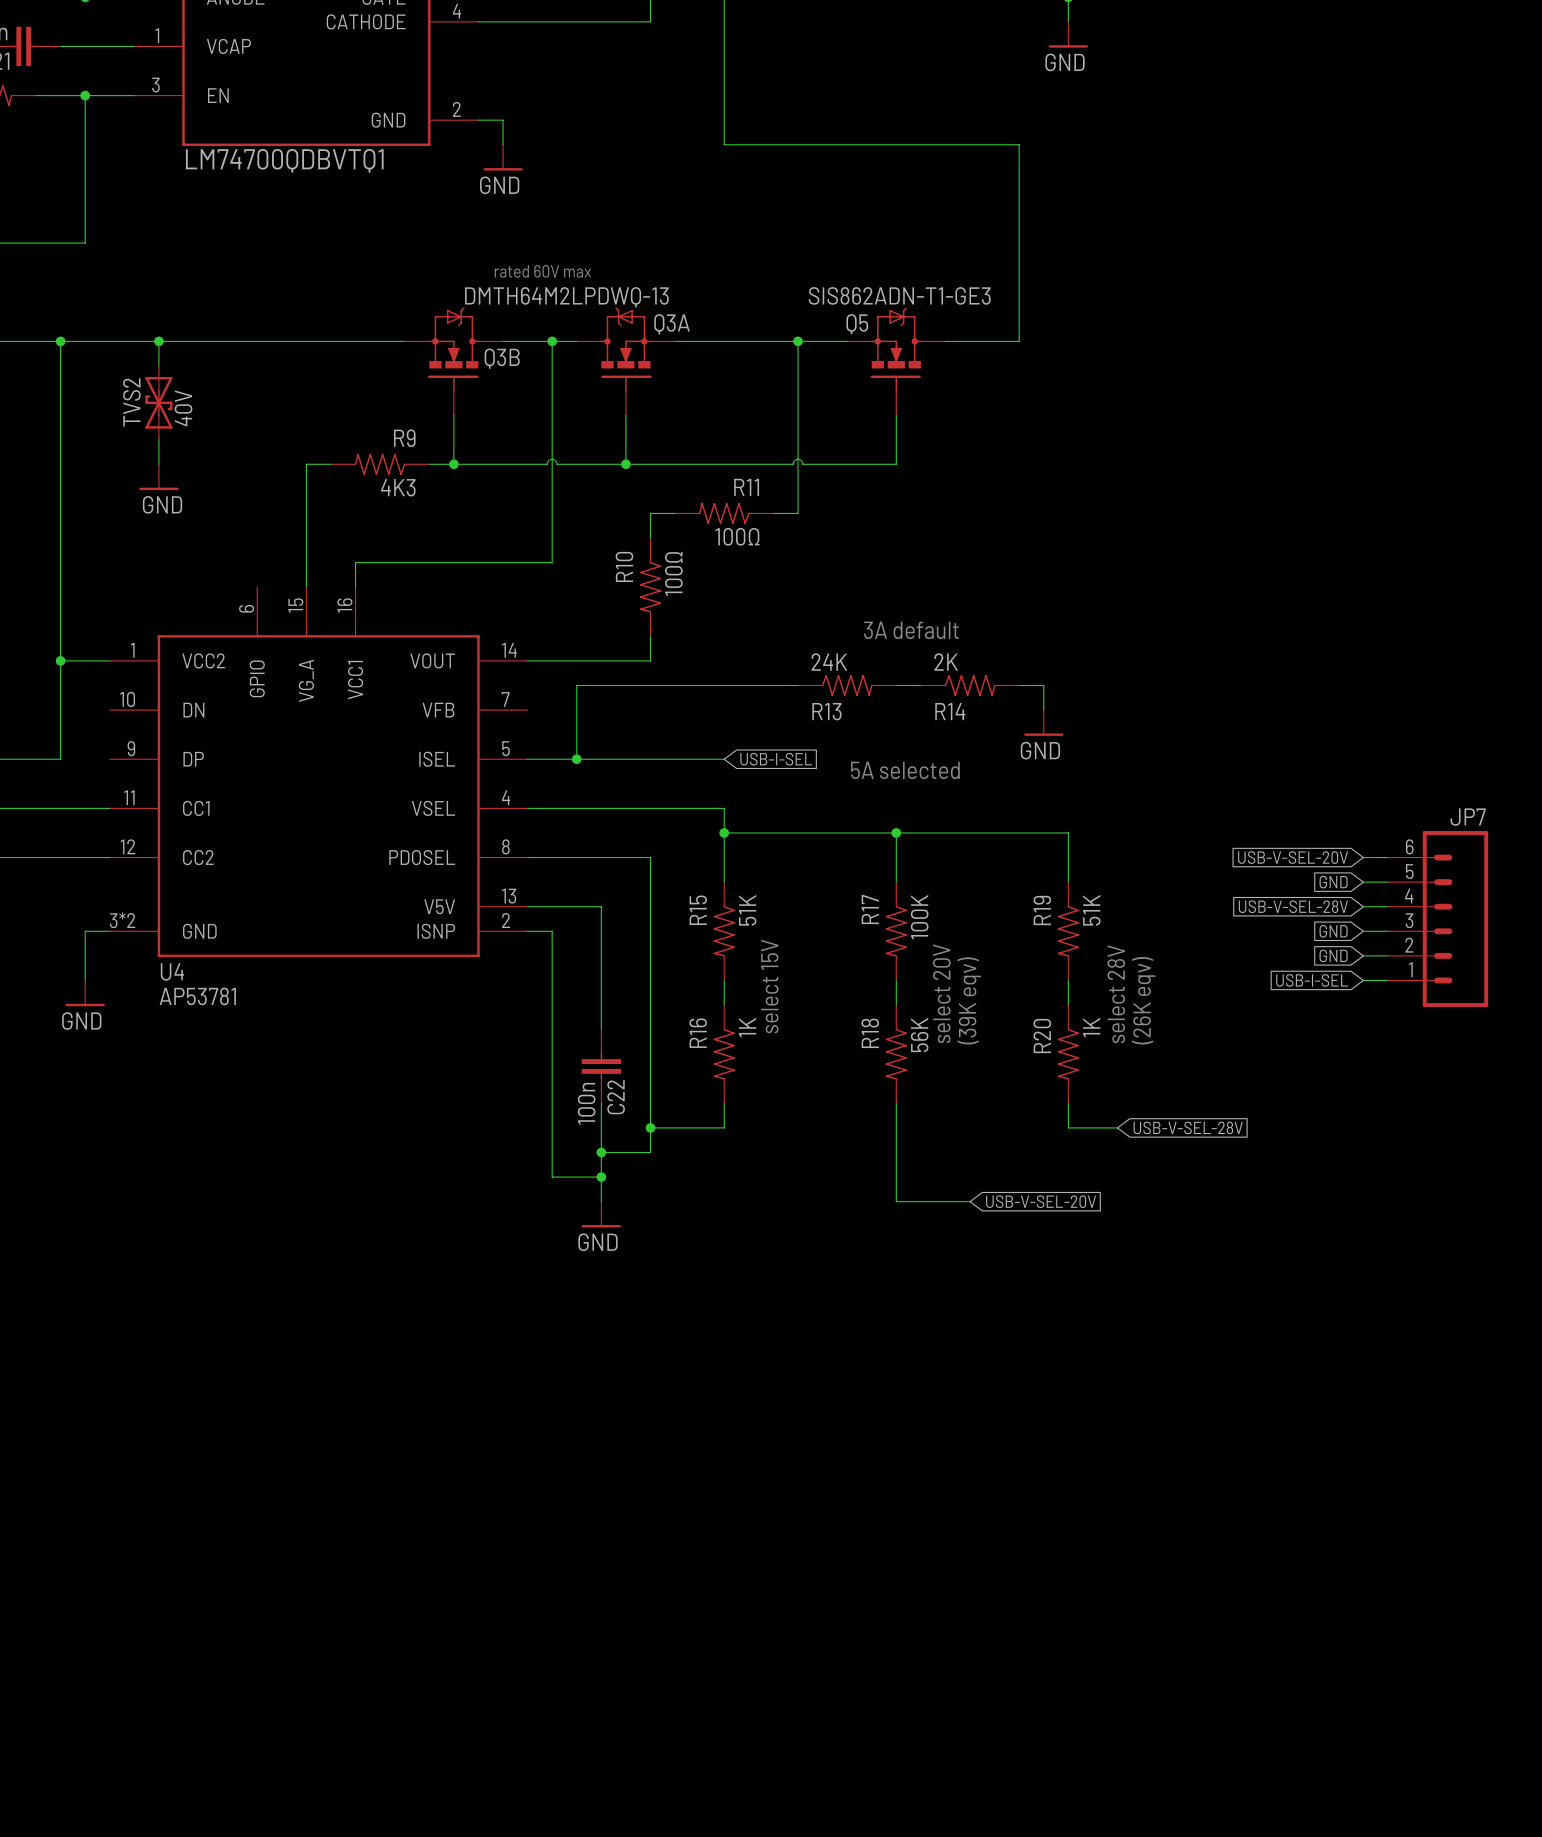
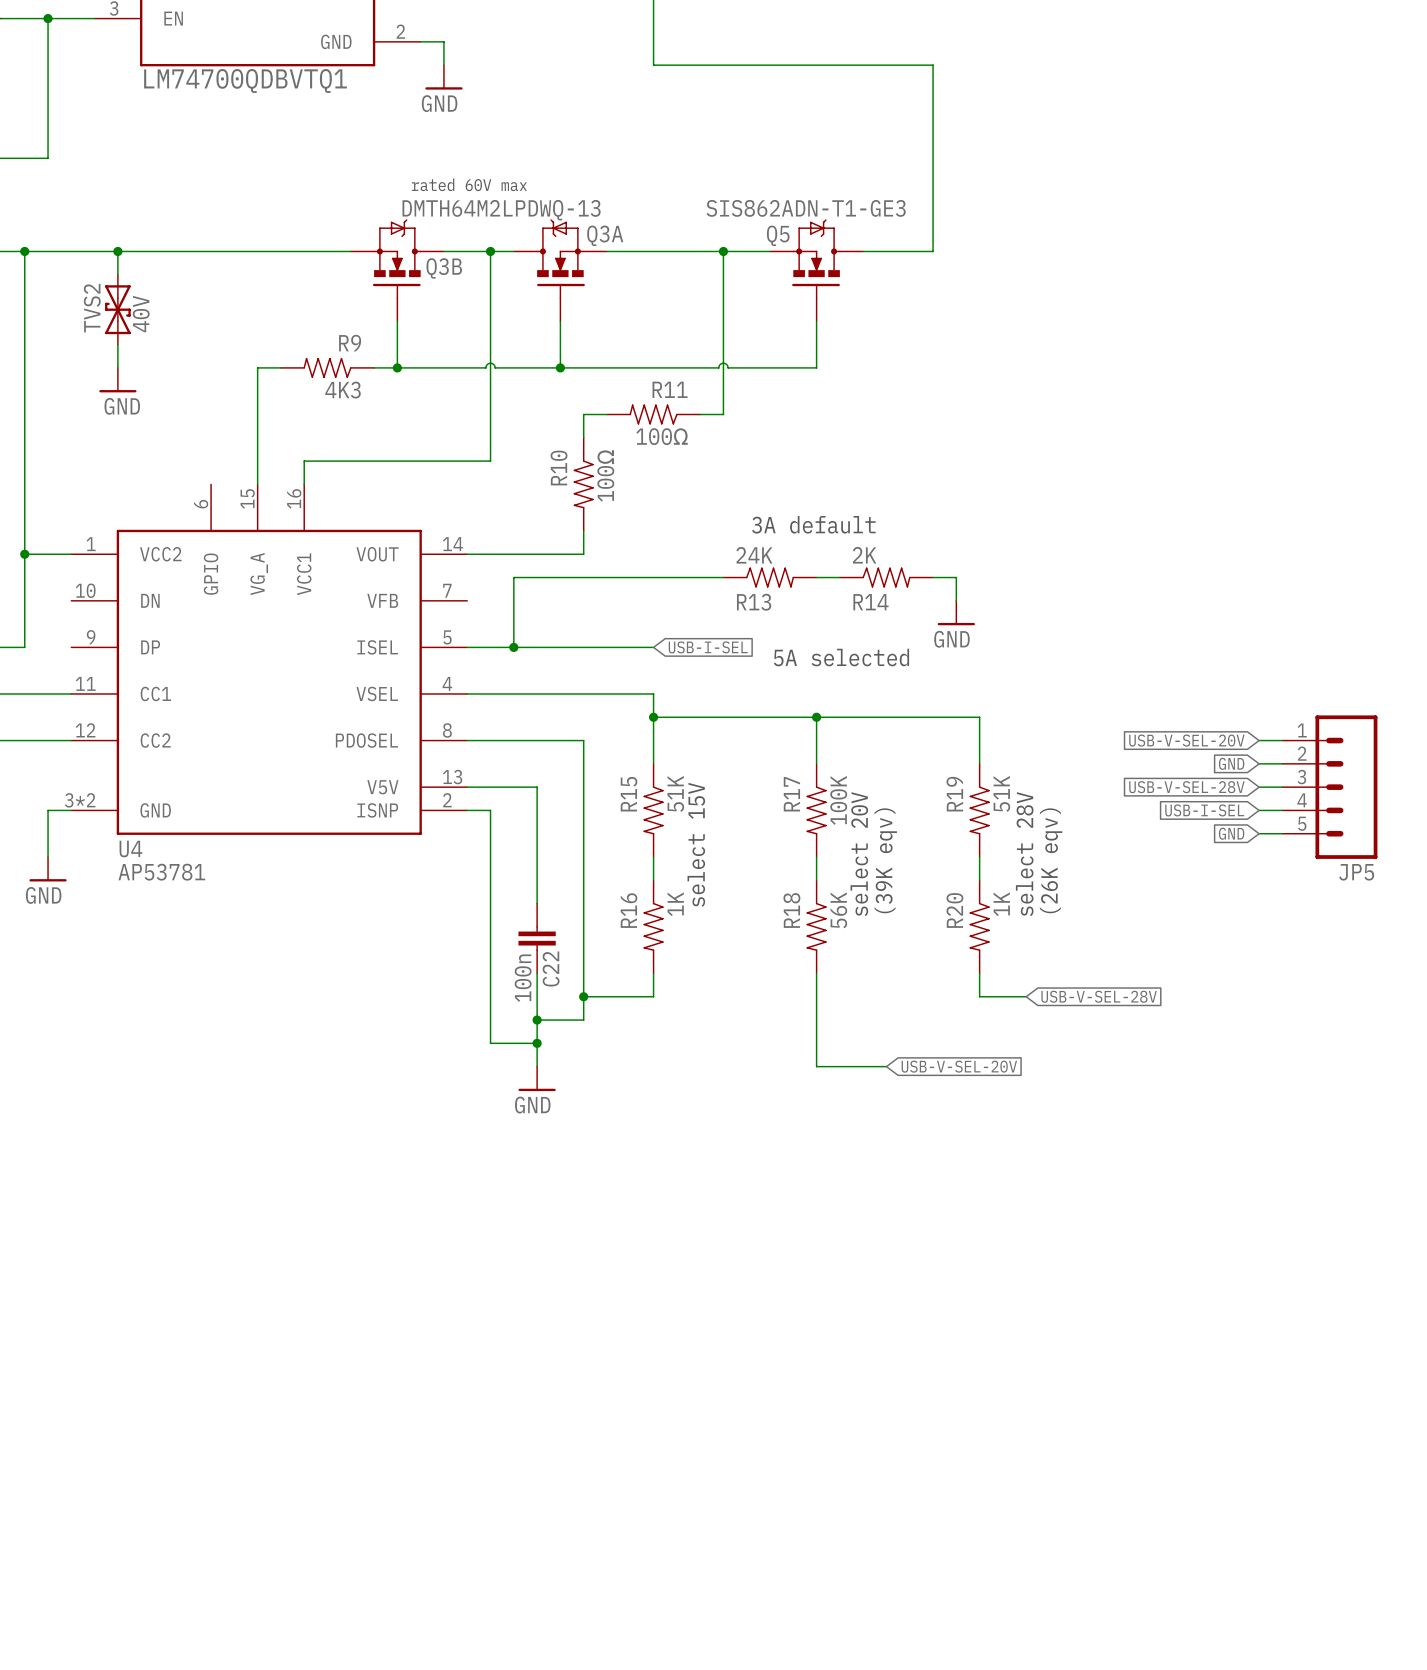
JP5: none -> (1329, 787)
JP7: (1438, 919) -> none
global label: GND (1333, 931) -> USB-I-SEL (1204, 810)
global label: USB-I-SEL (1312, 980) -> none
wire: (1363, 980) (1387, 980) -> none

